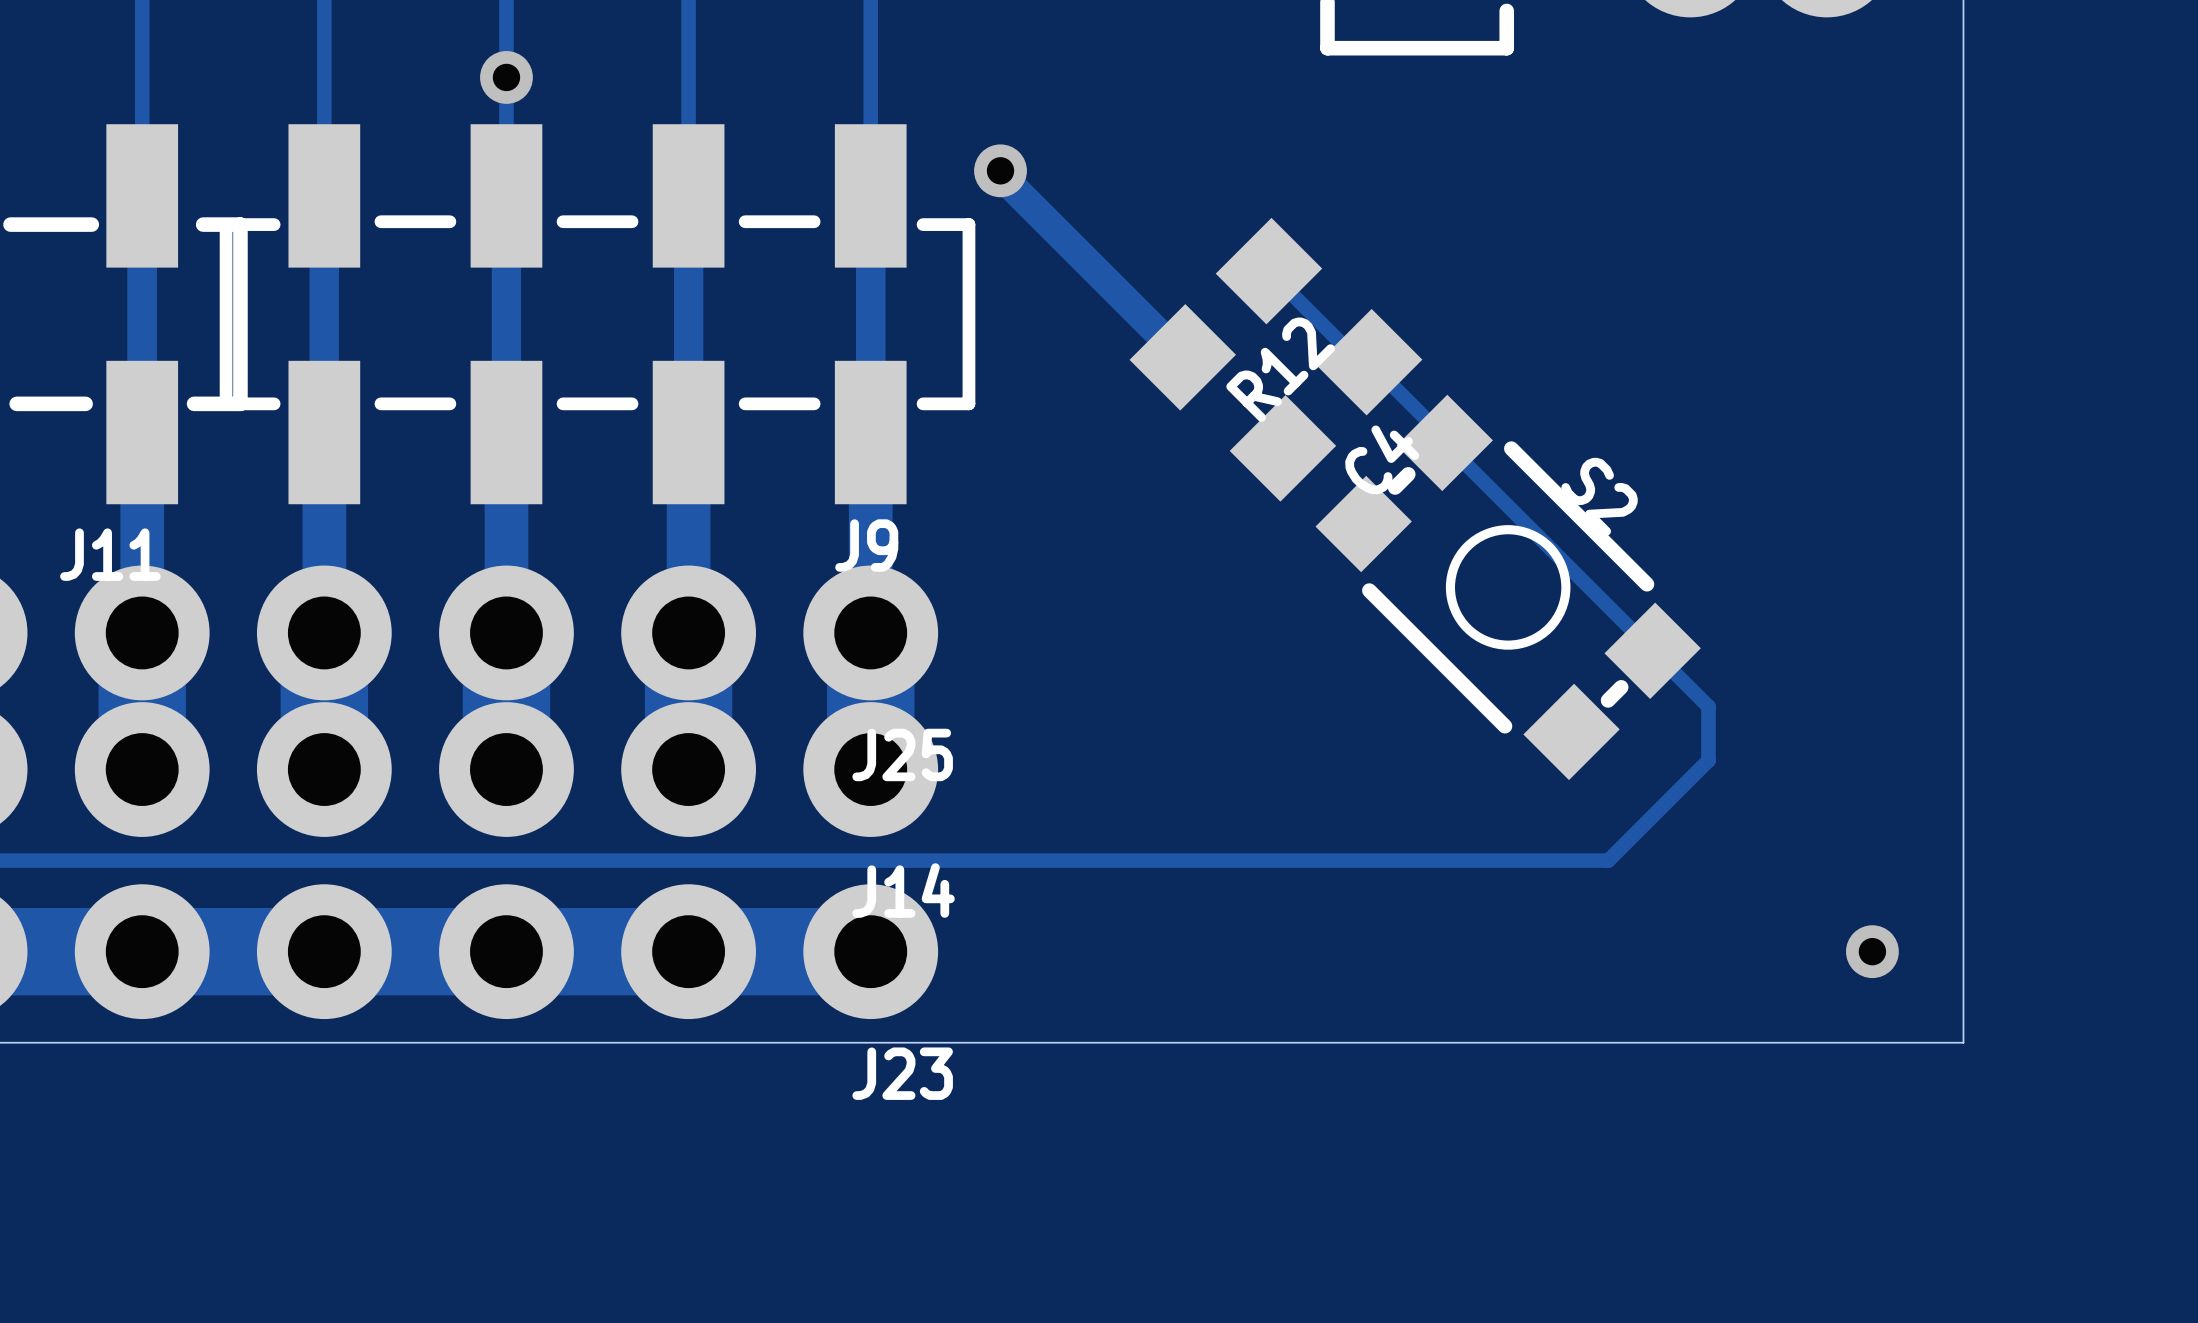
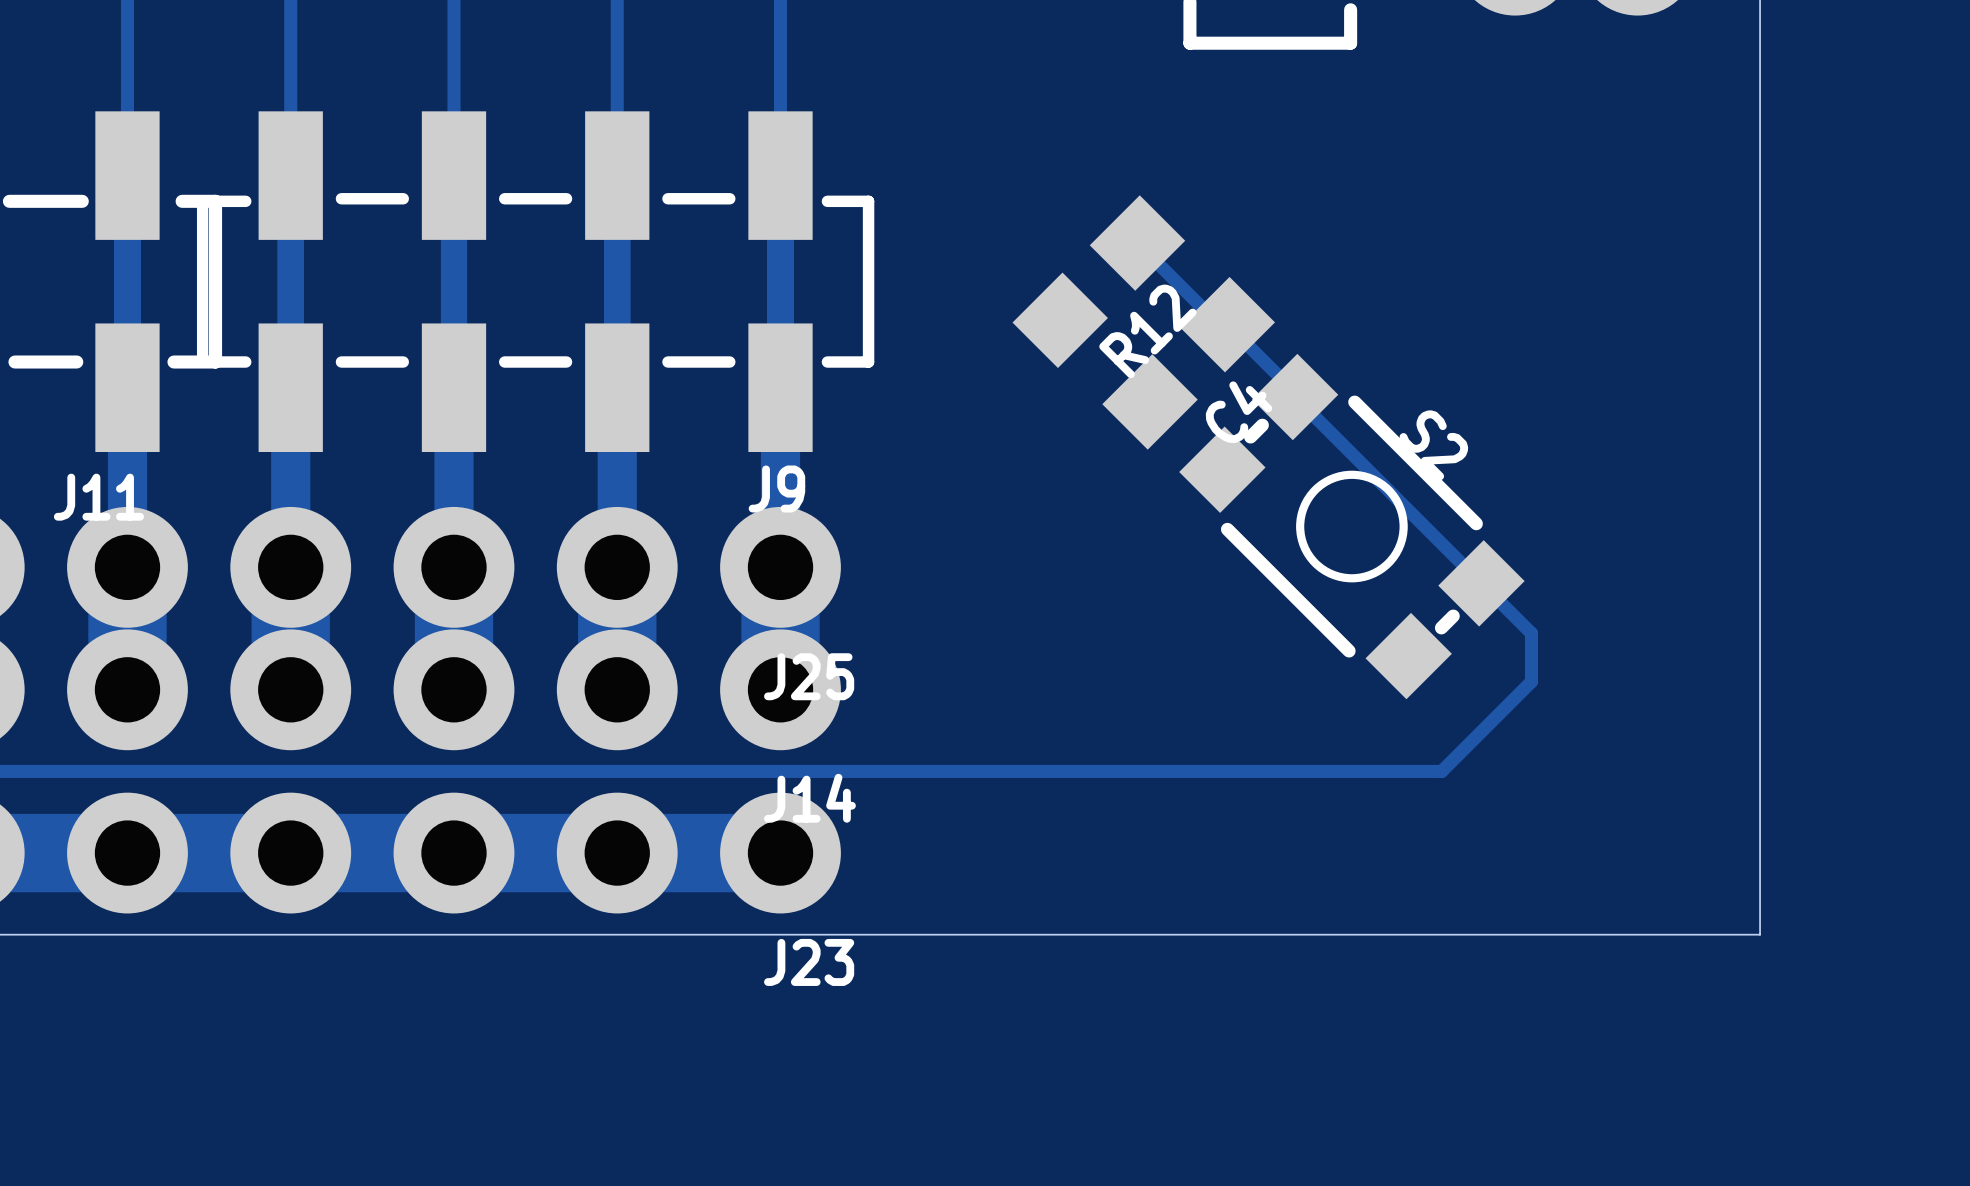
via: (506, 77) -> none
track: (1000, 170) (1000, 175) (1182, 357) -> none
via: (1000, 170) -> none
via: (1872, 951) -> none

